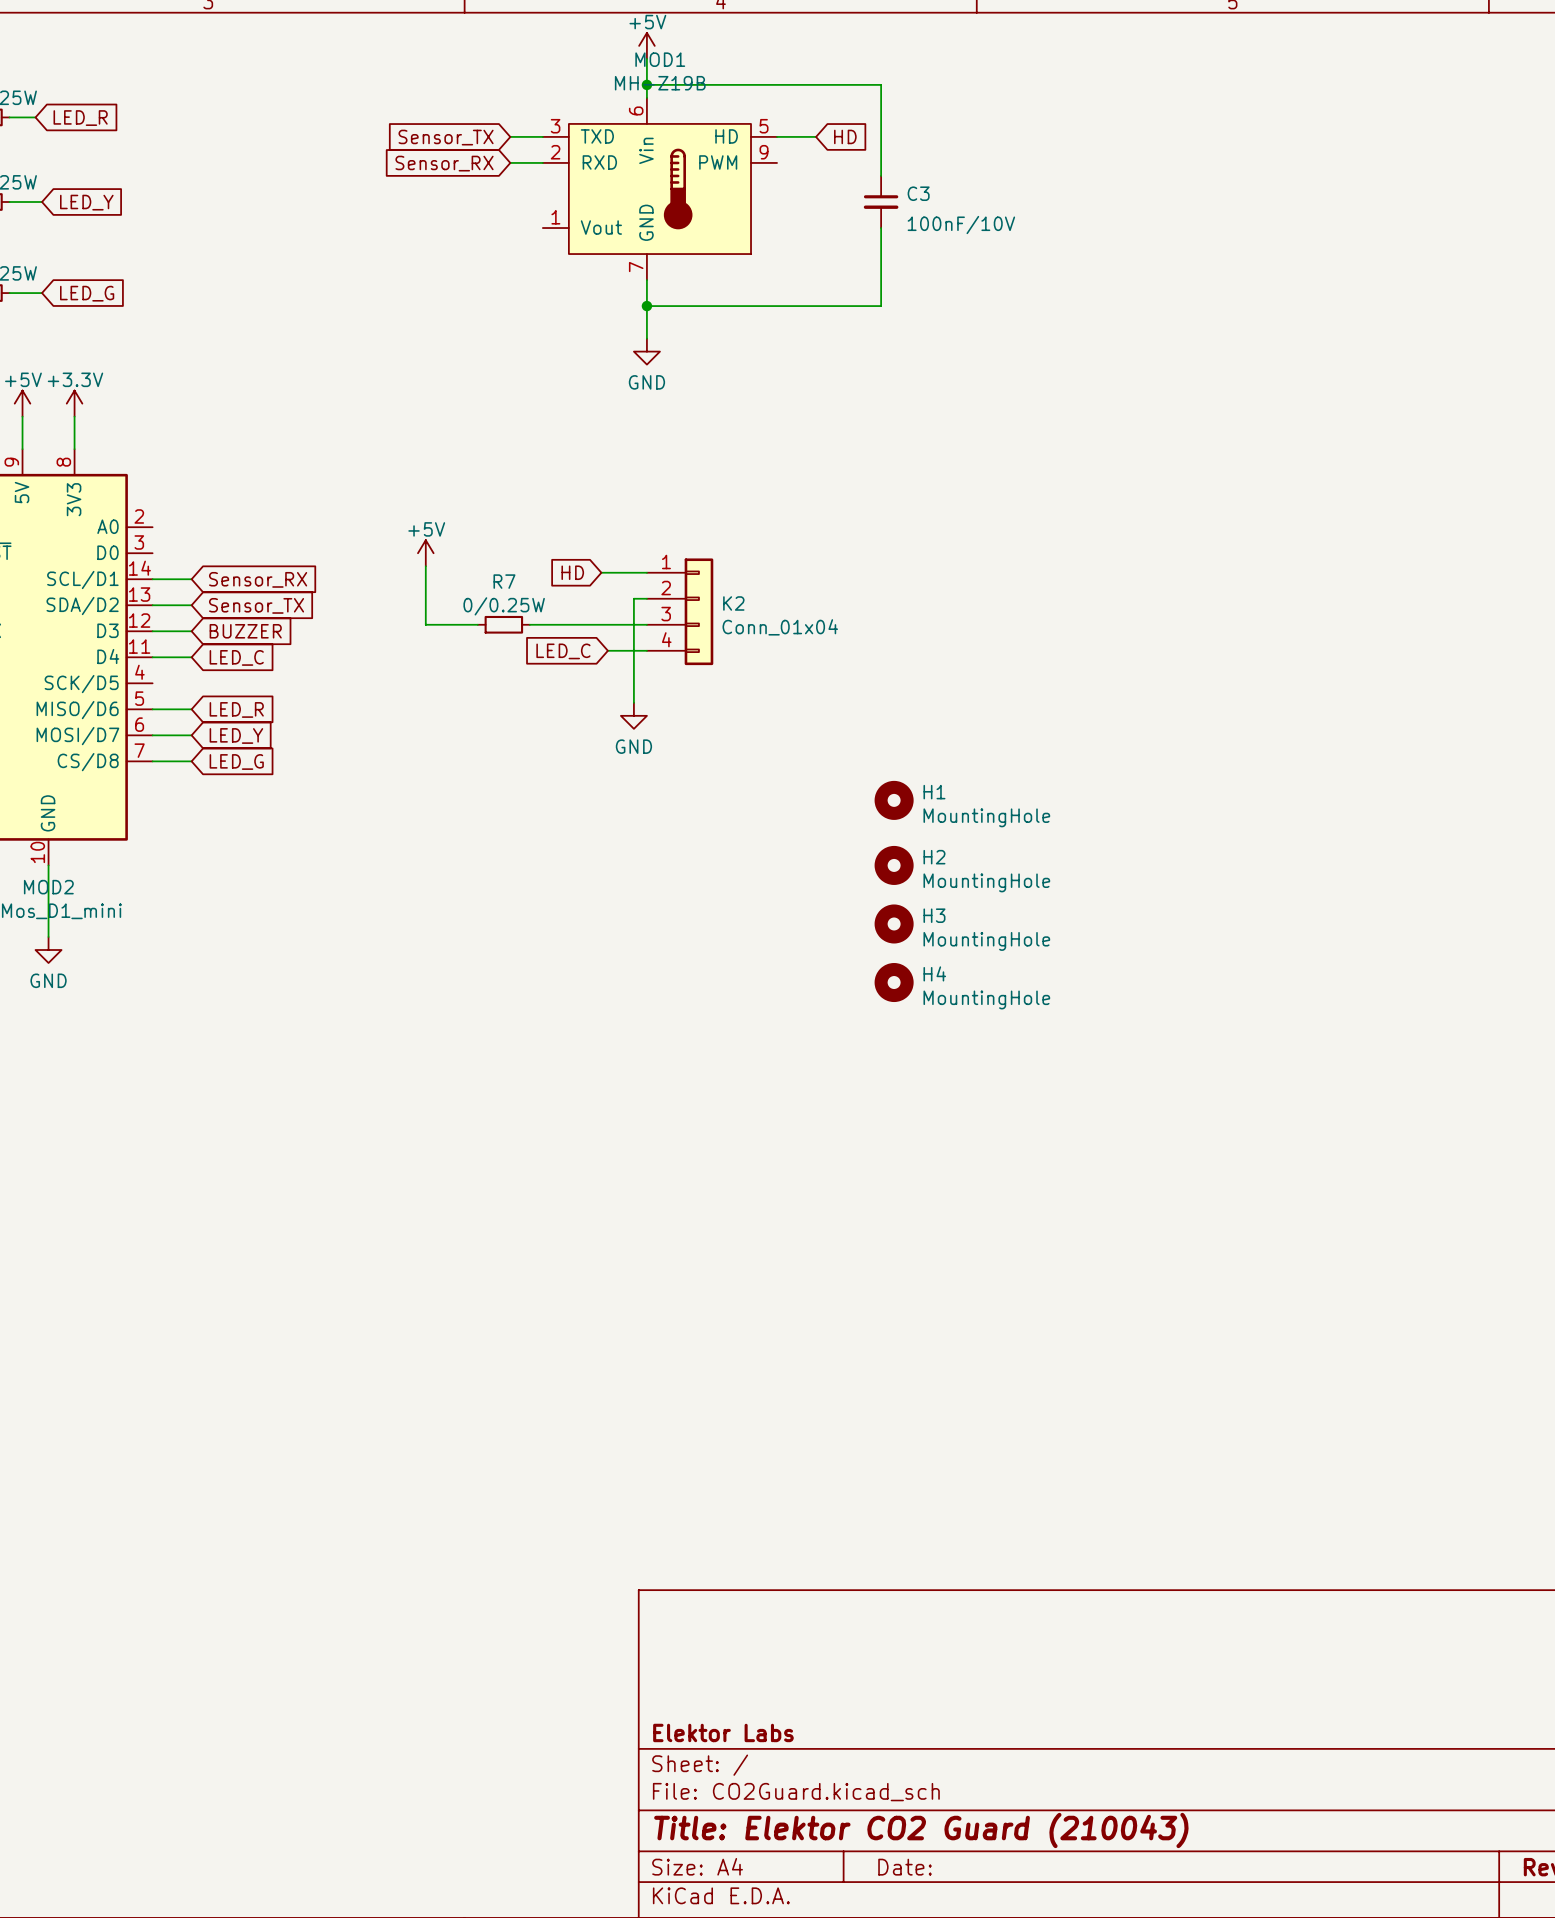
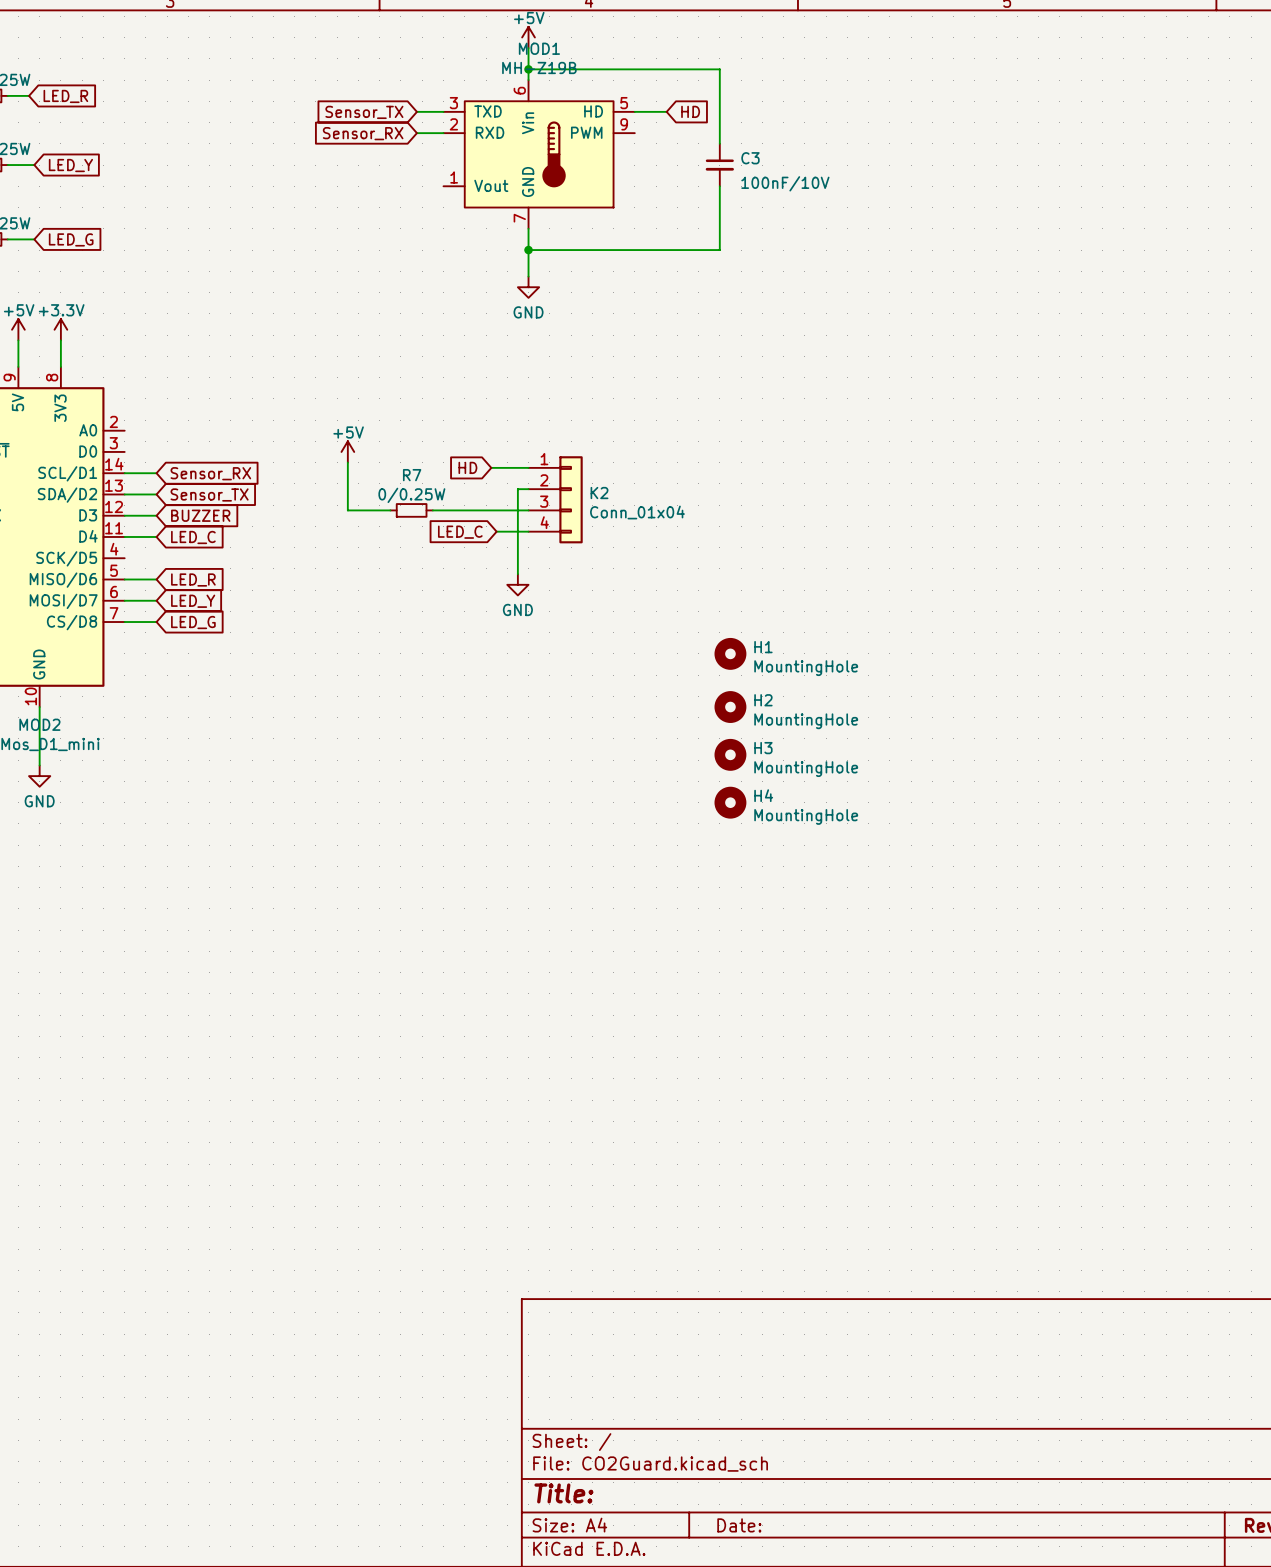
title block: Elektor Labs (723, 1732) -> none
title block: Title: Elektor CO2 Guard (210043) (921, 1830) -> Title: (563, 1493)

